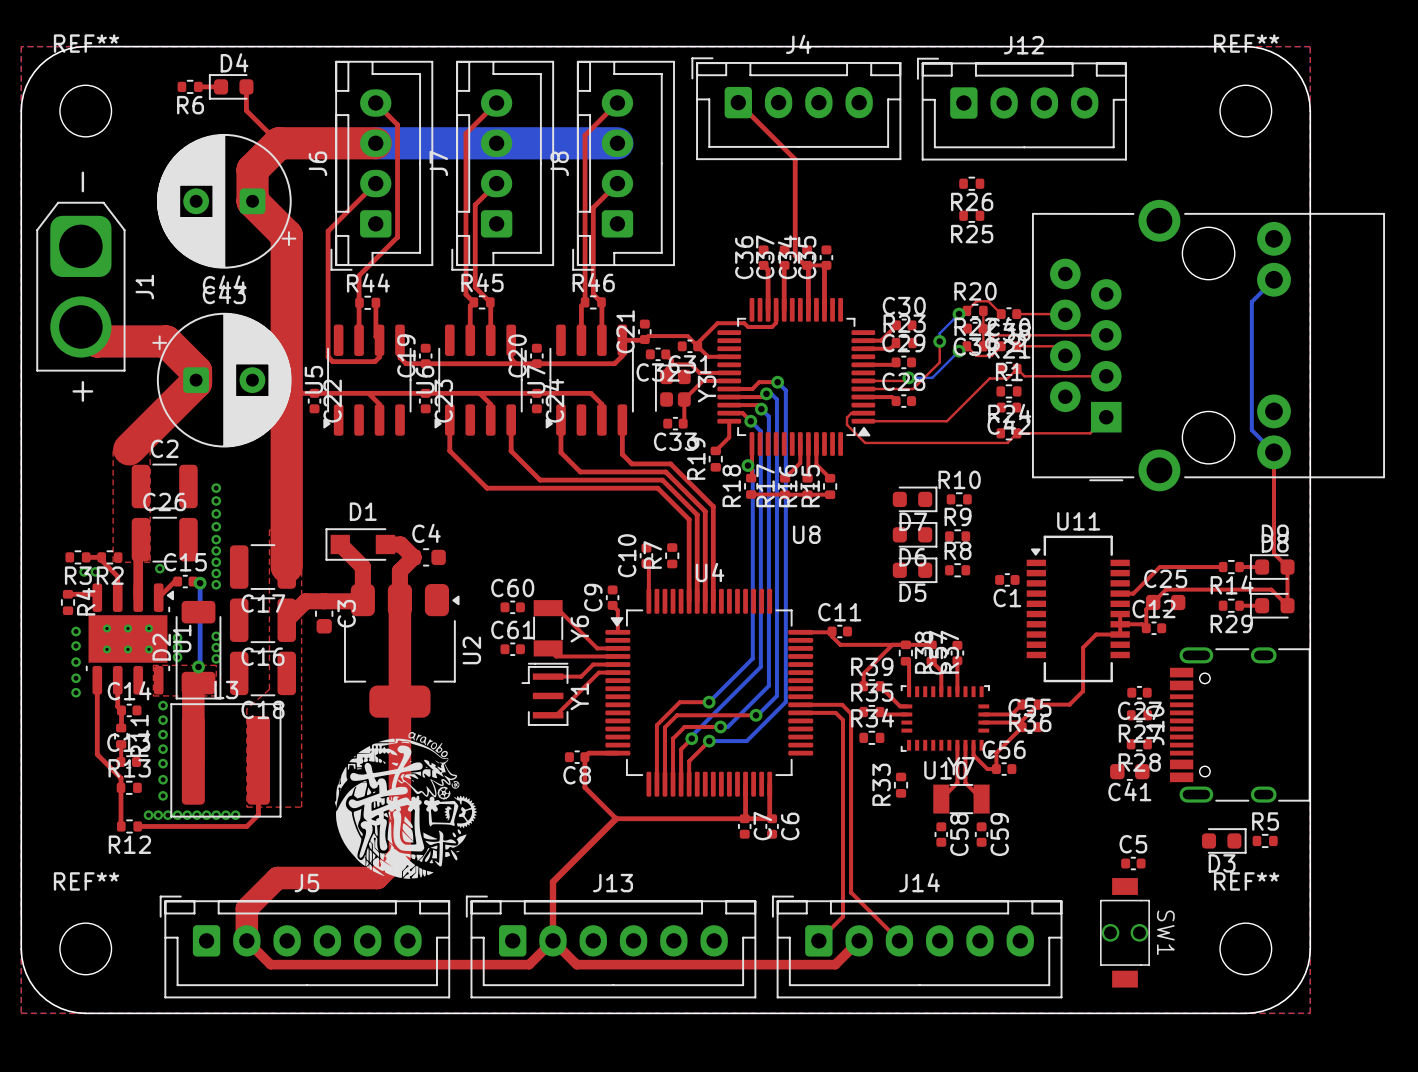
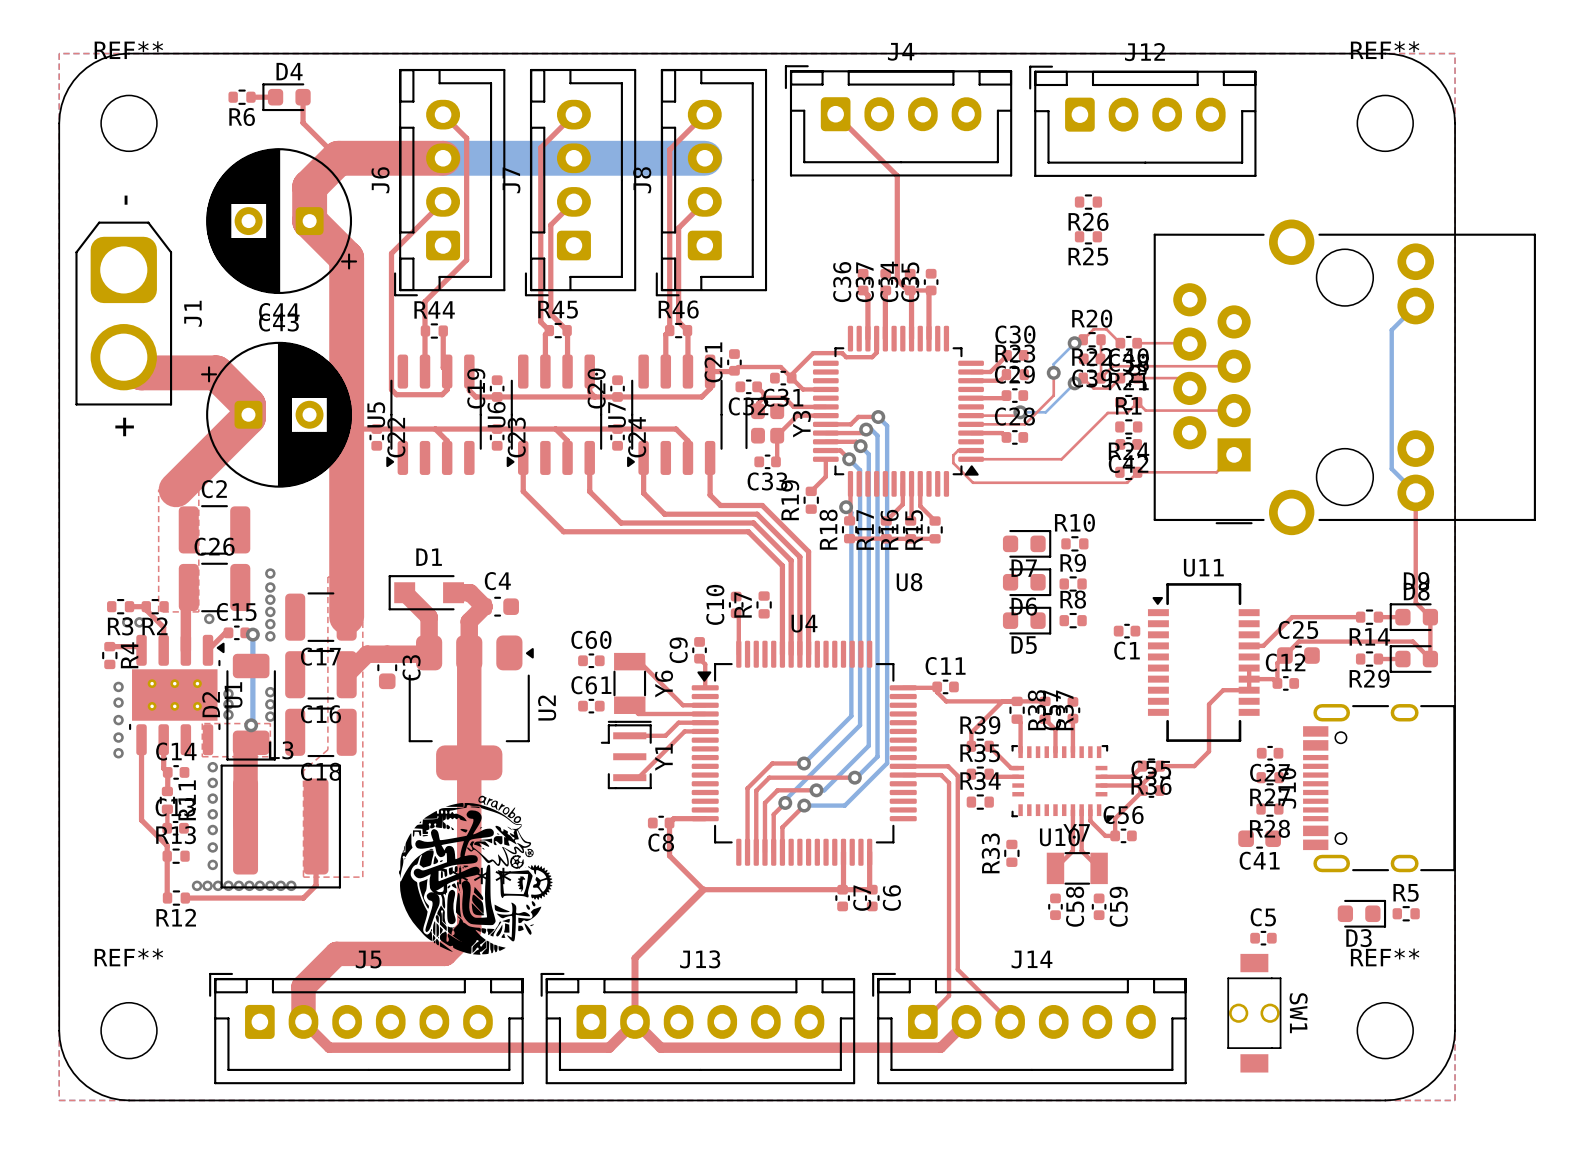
via: (216, 488) -> none
via: (216, 500) -> none
via: (216, 513) -> none

